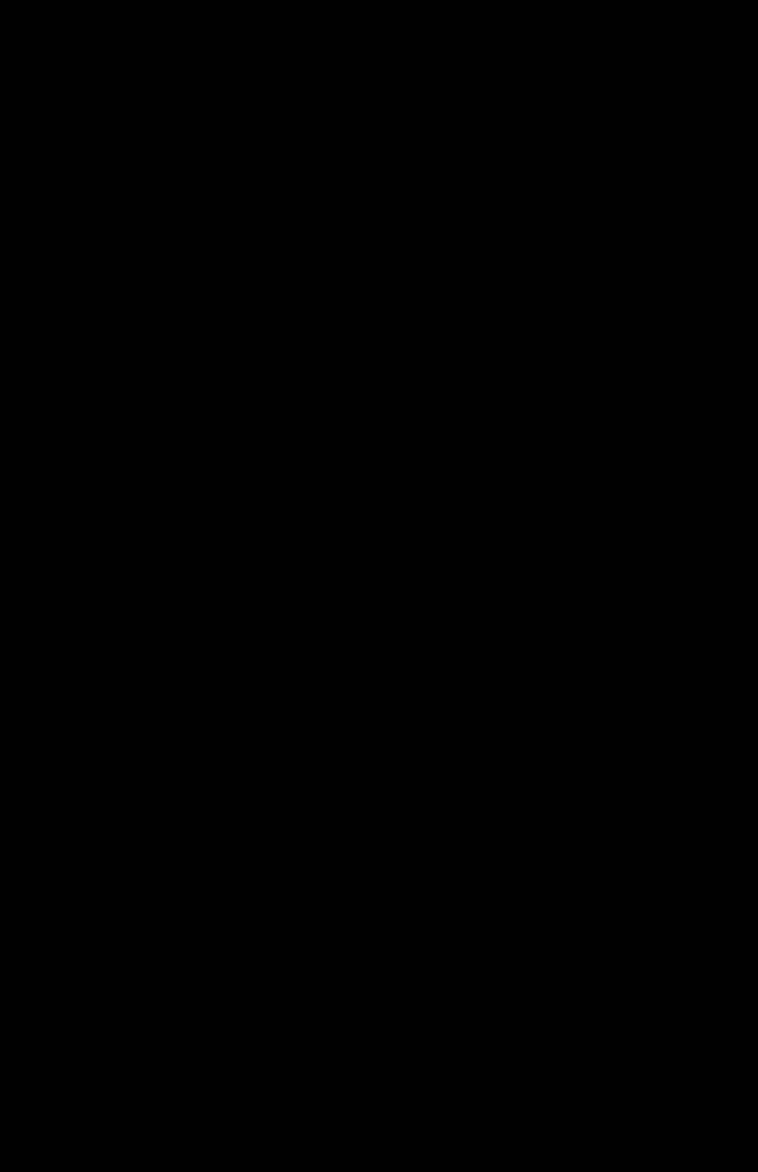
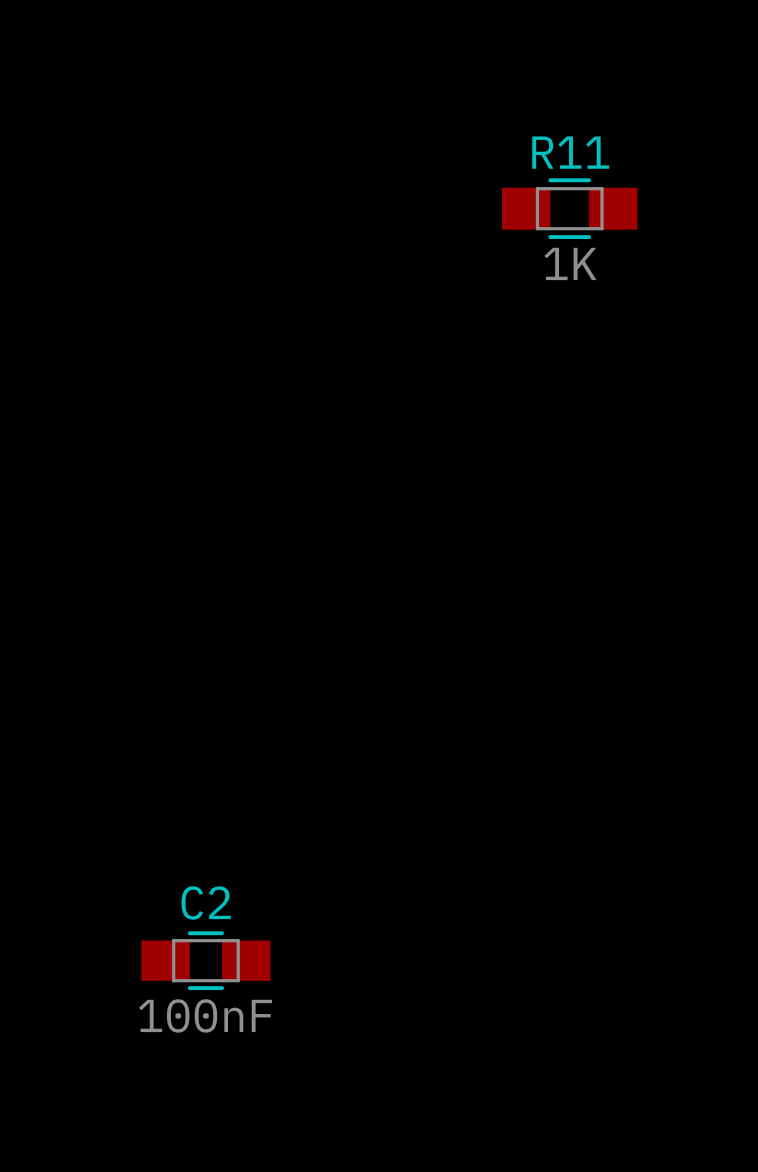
R11: none -> 1K (569, 208)
C2: none -> 100nF (205, 960)

